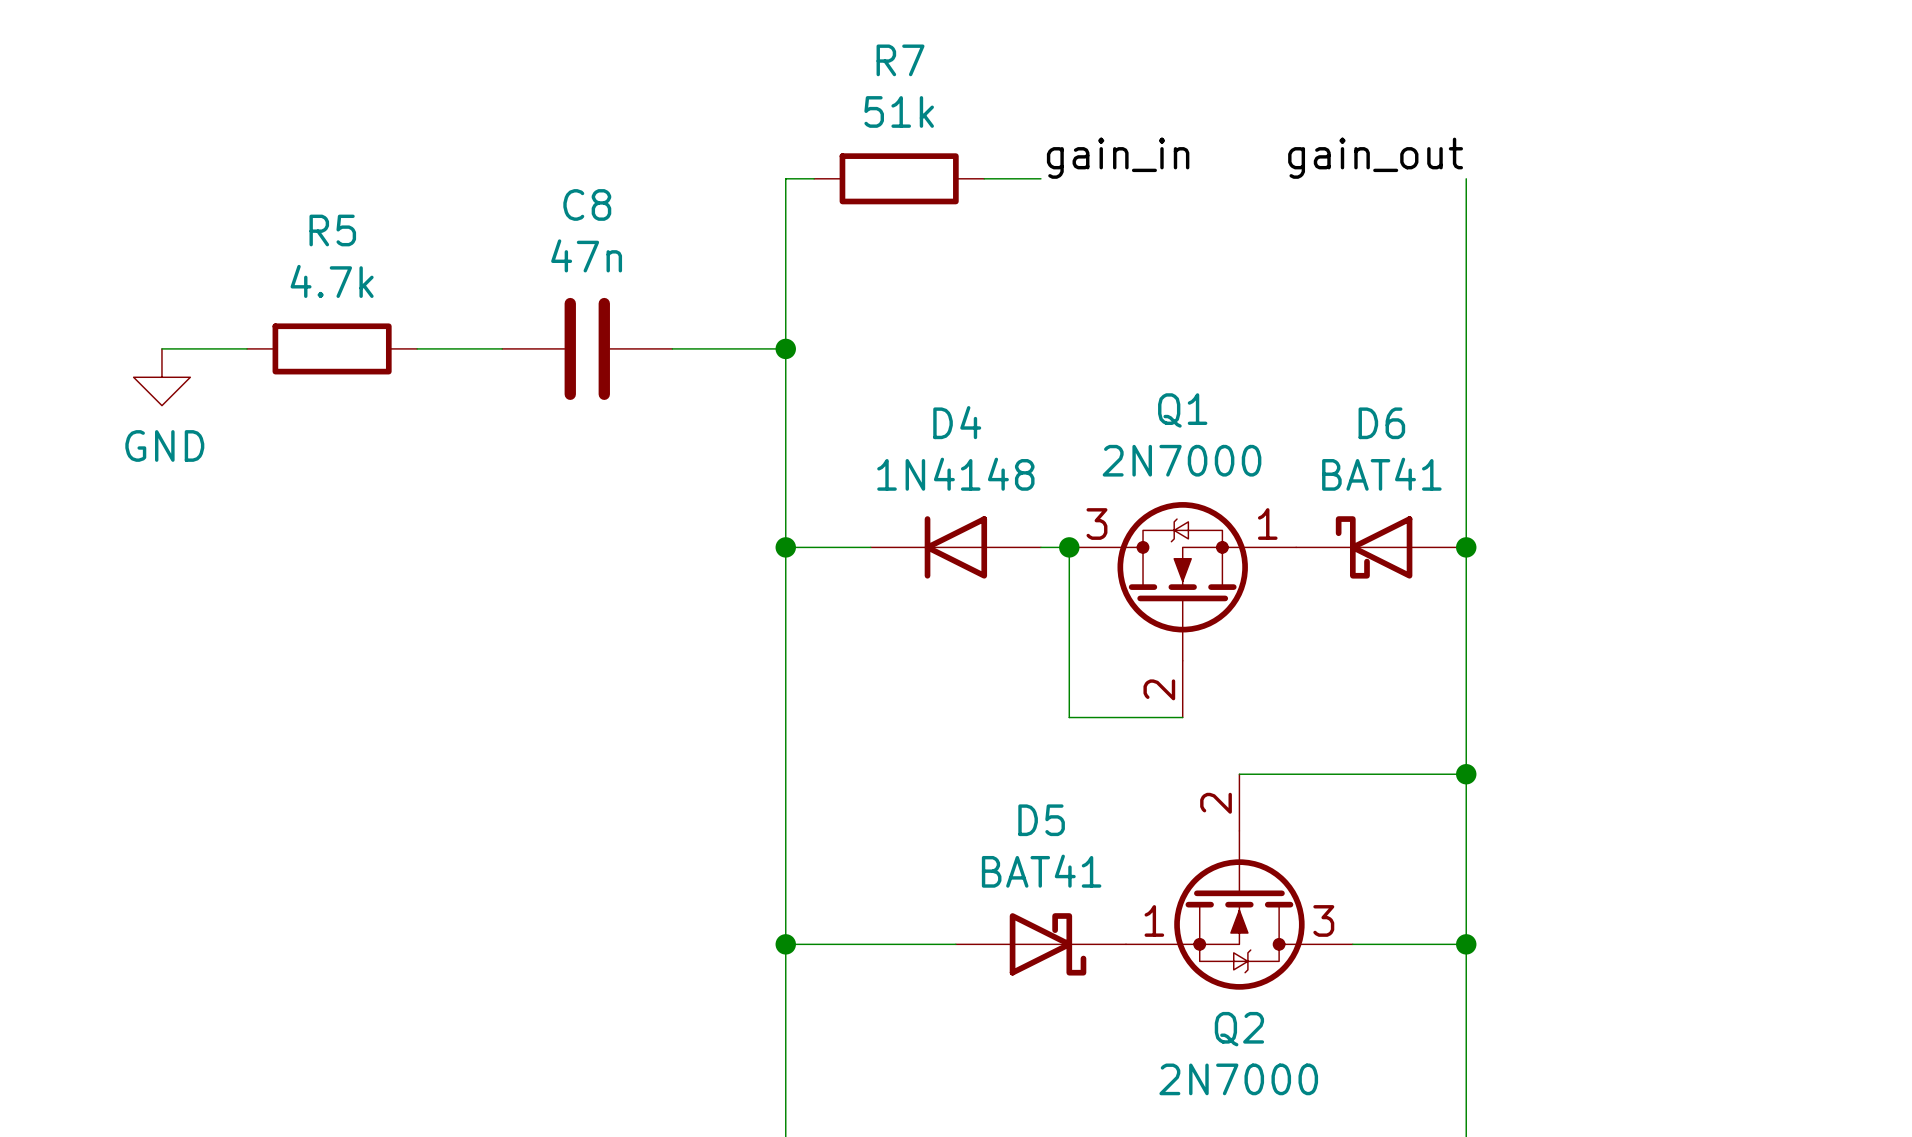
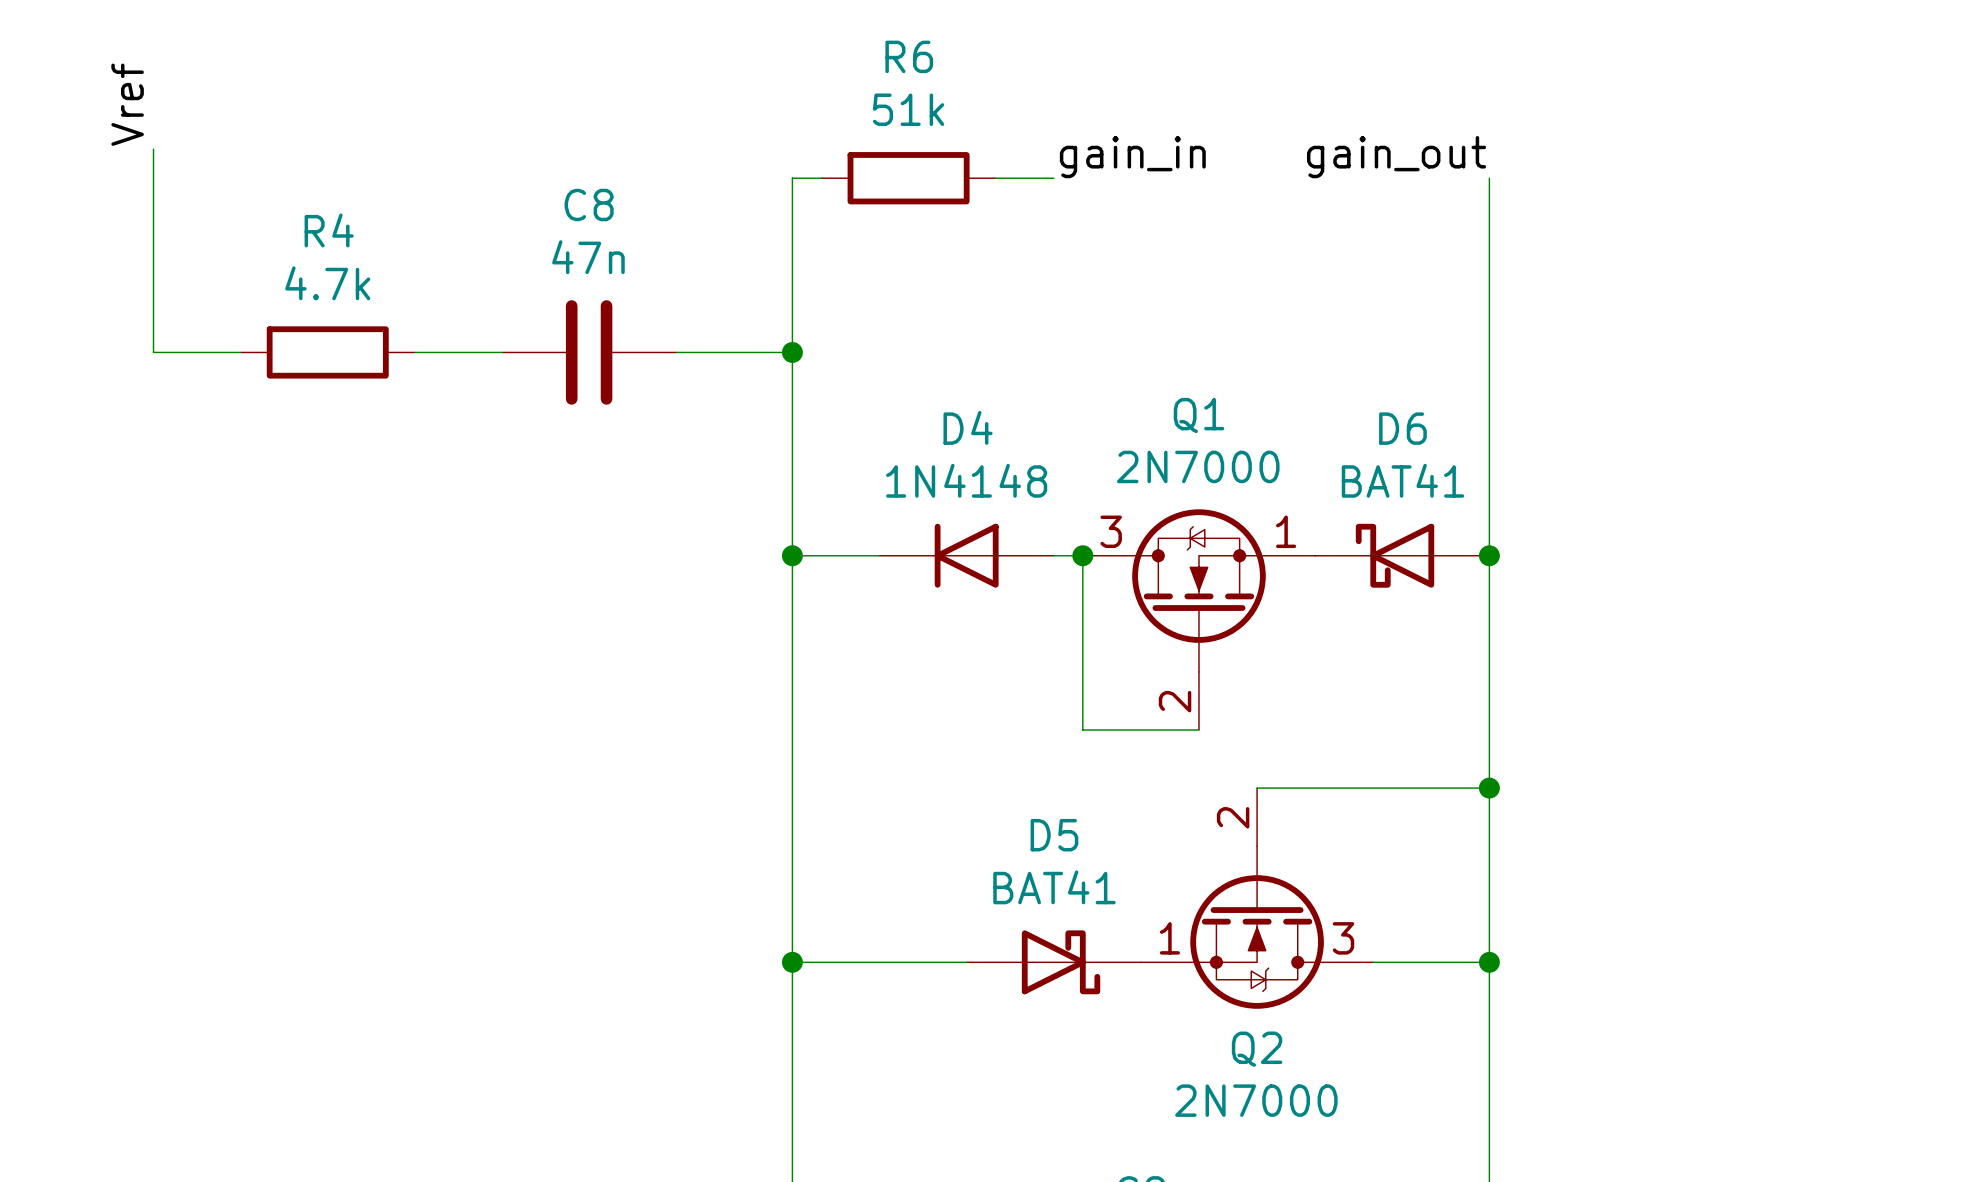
R7 name: R7 (900, 60) -> R6 (909, 56)
label: none -> Vref (127, 104)
wire: none -> (153, 149) (153, 352)
R5 name: R5 (332, 230) -> R4 (329, 230)
power symbol: GND (161, 377) -> none

